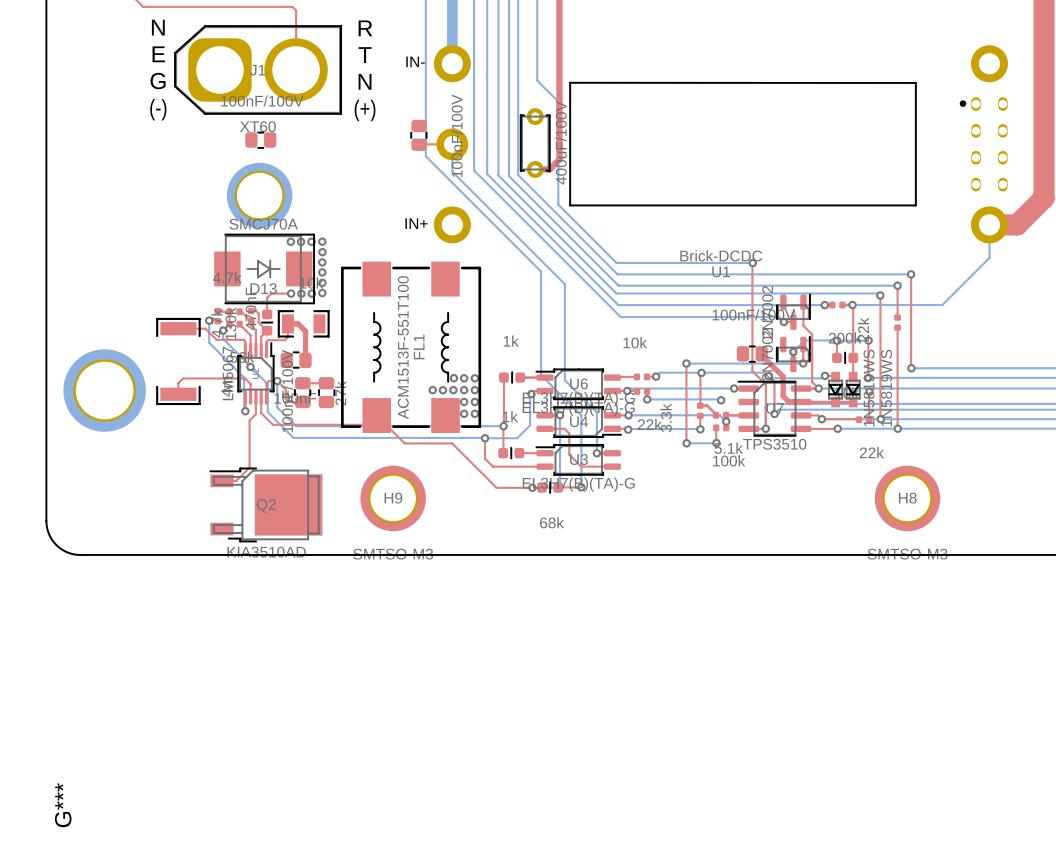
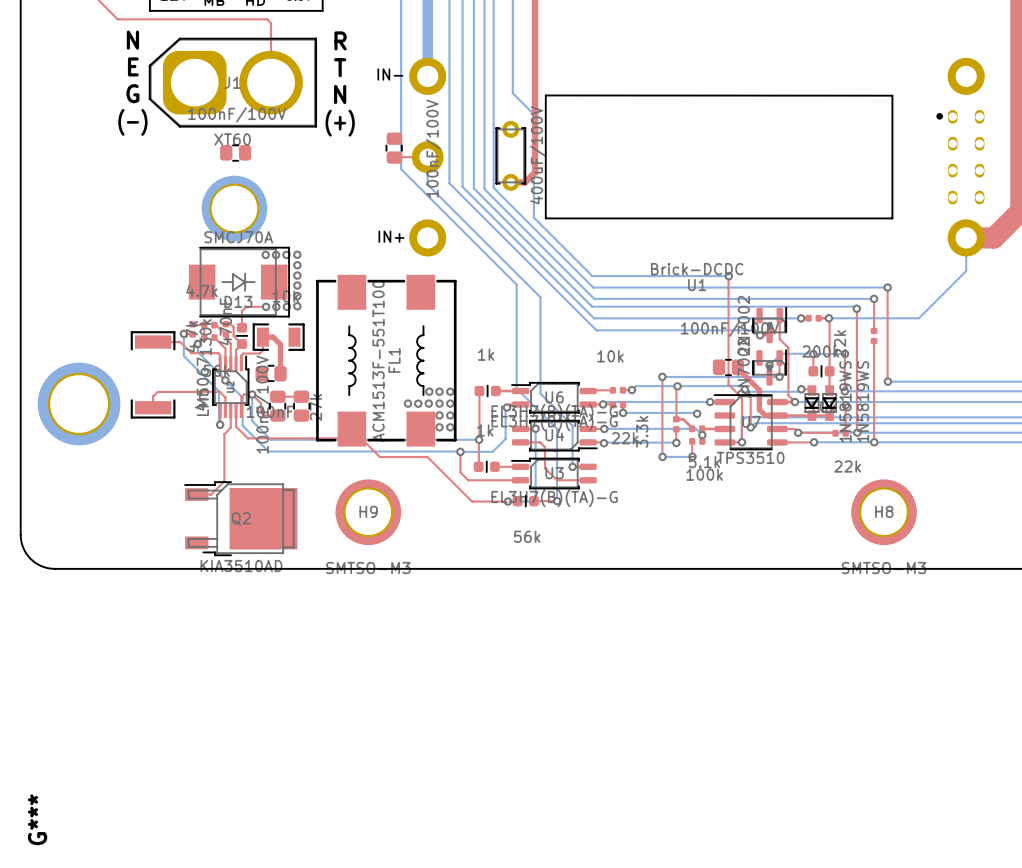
part value: 68k (552, 522) -> 56k (527, 536)

